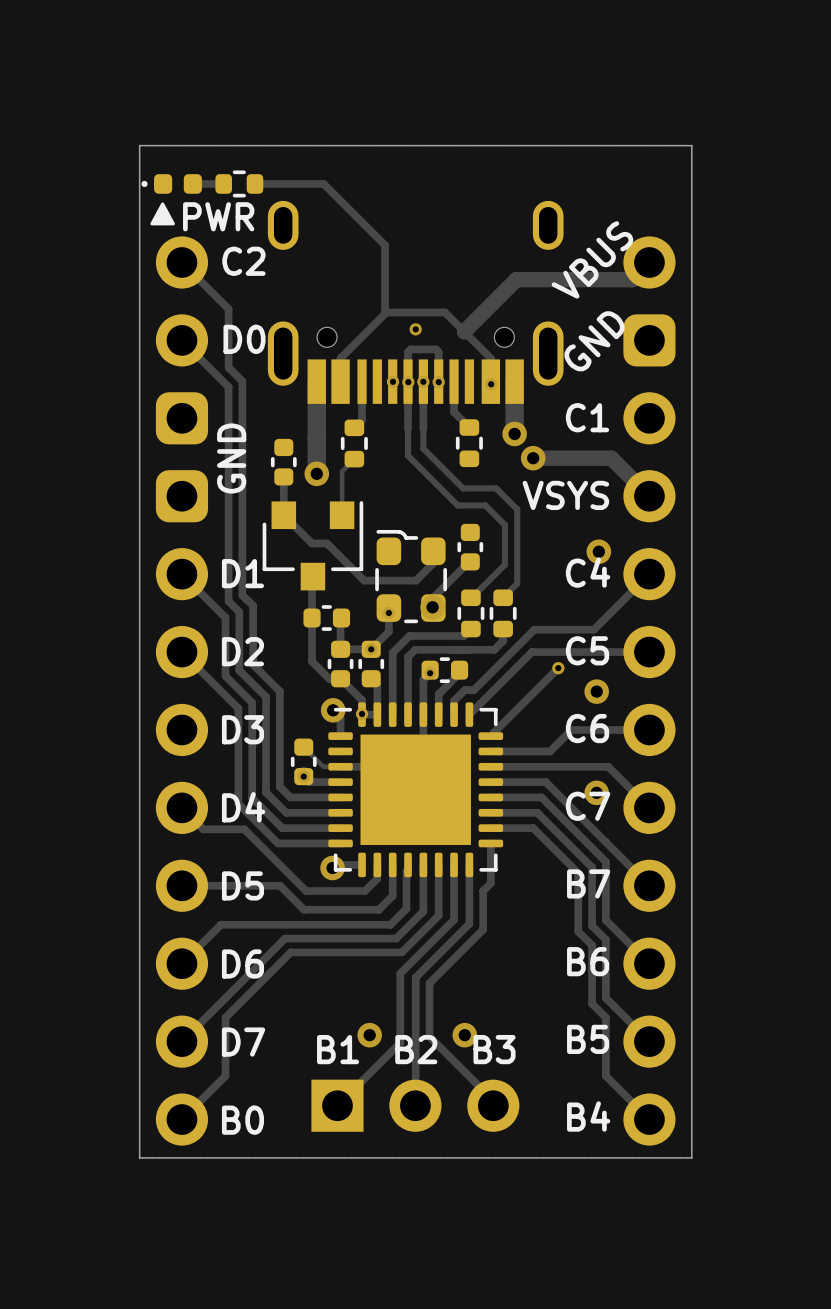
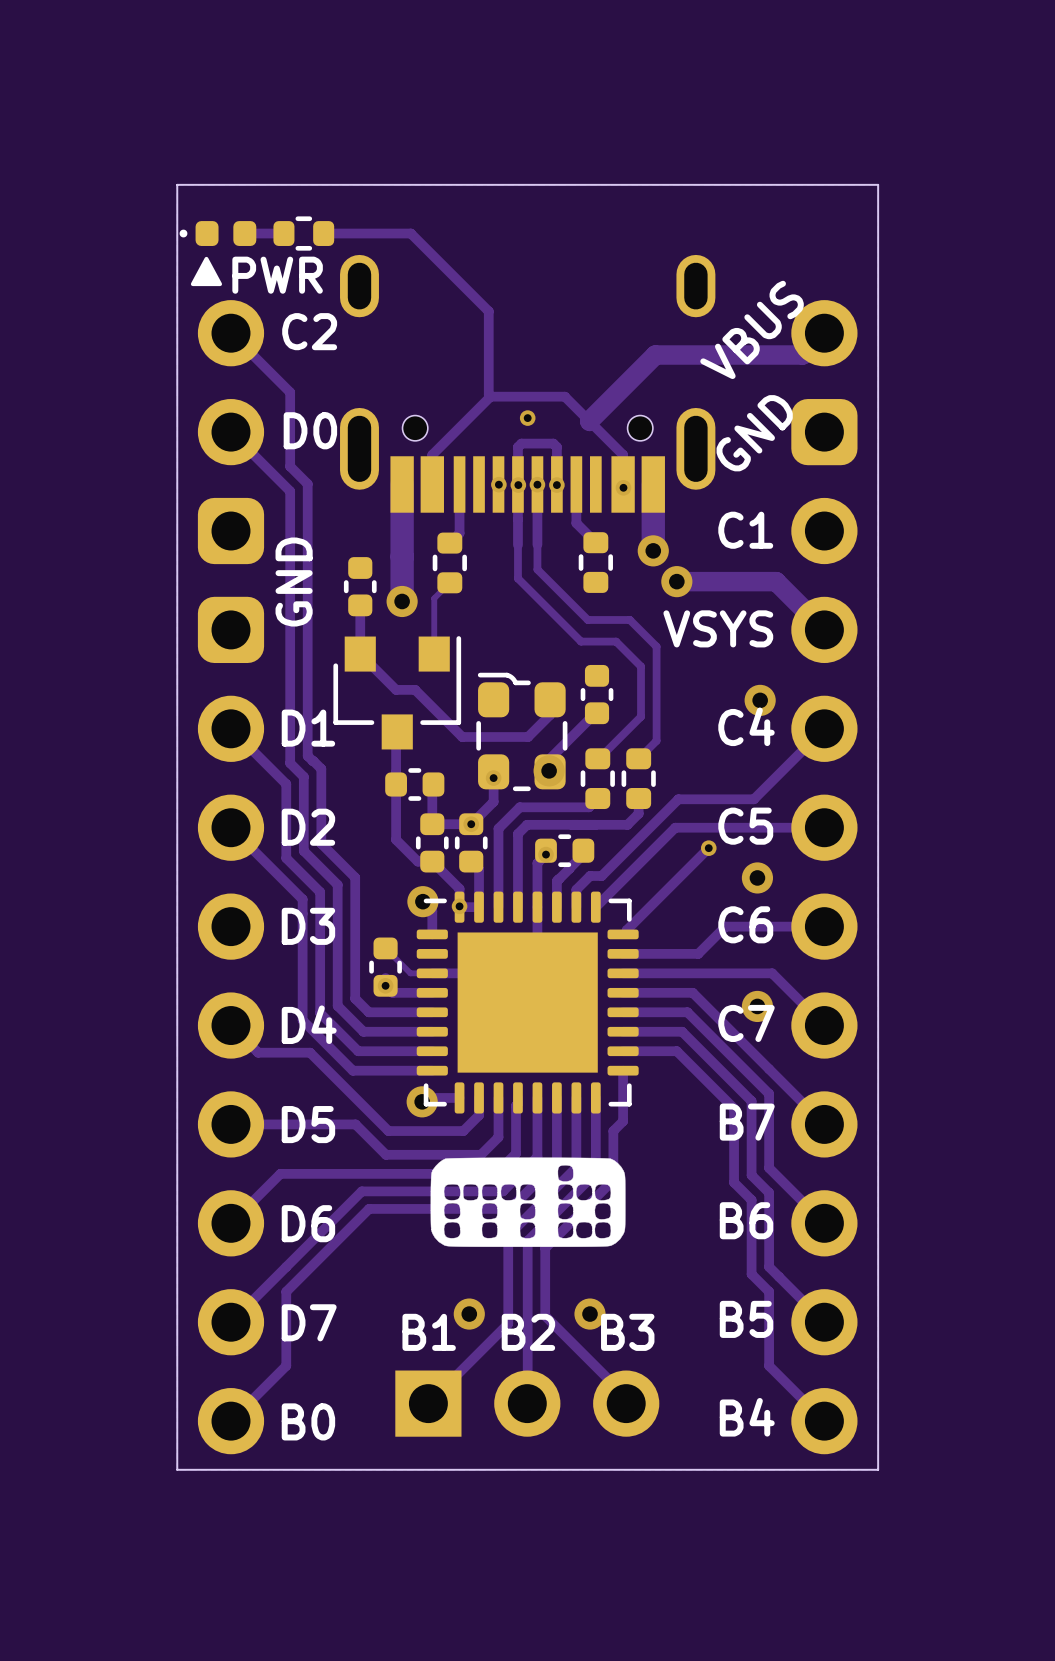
drawing: none -> [430, 1157, 626, 1247]

